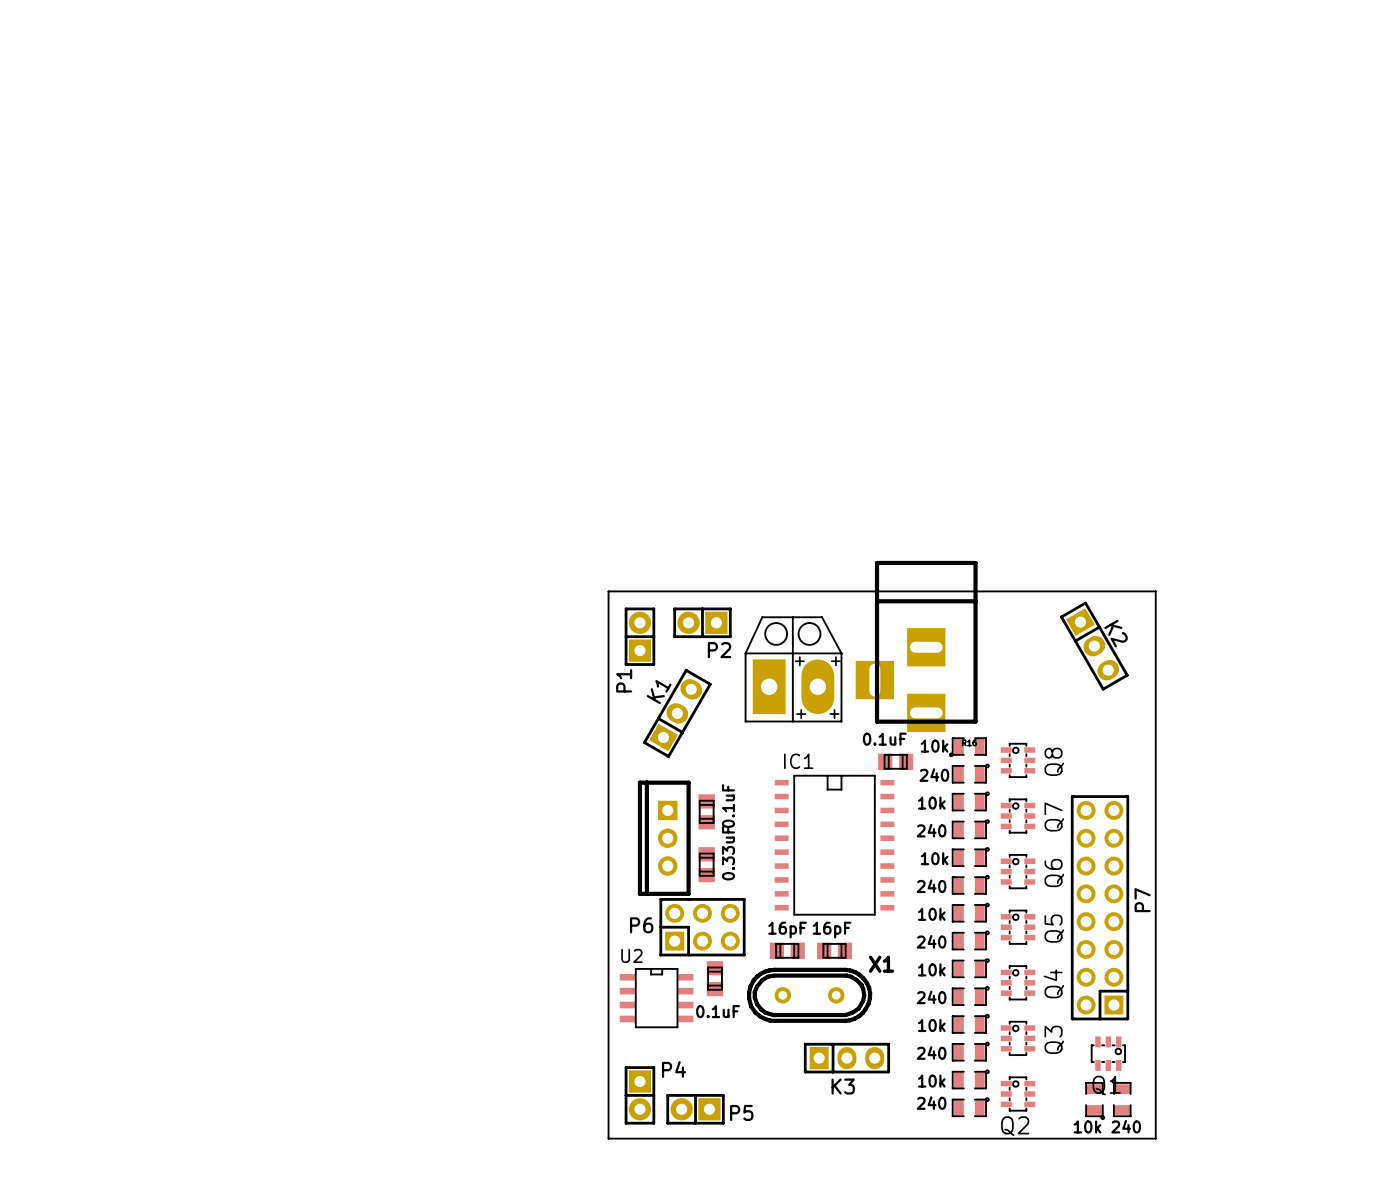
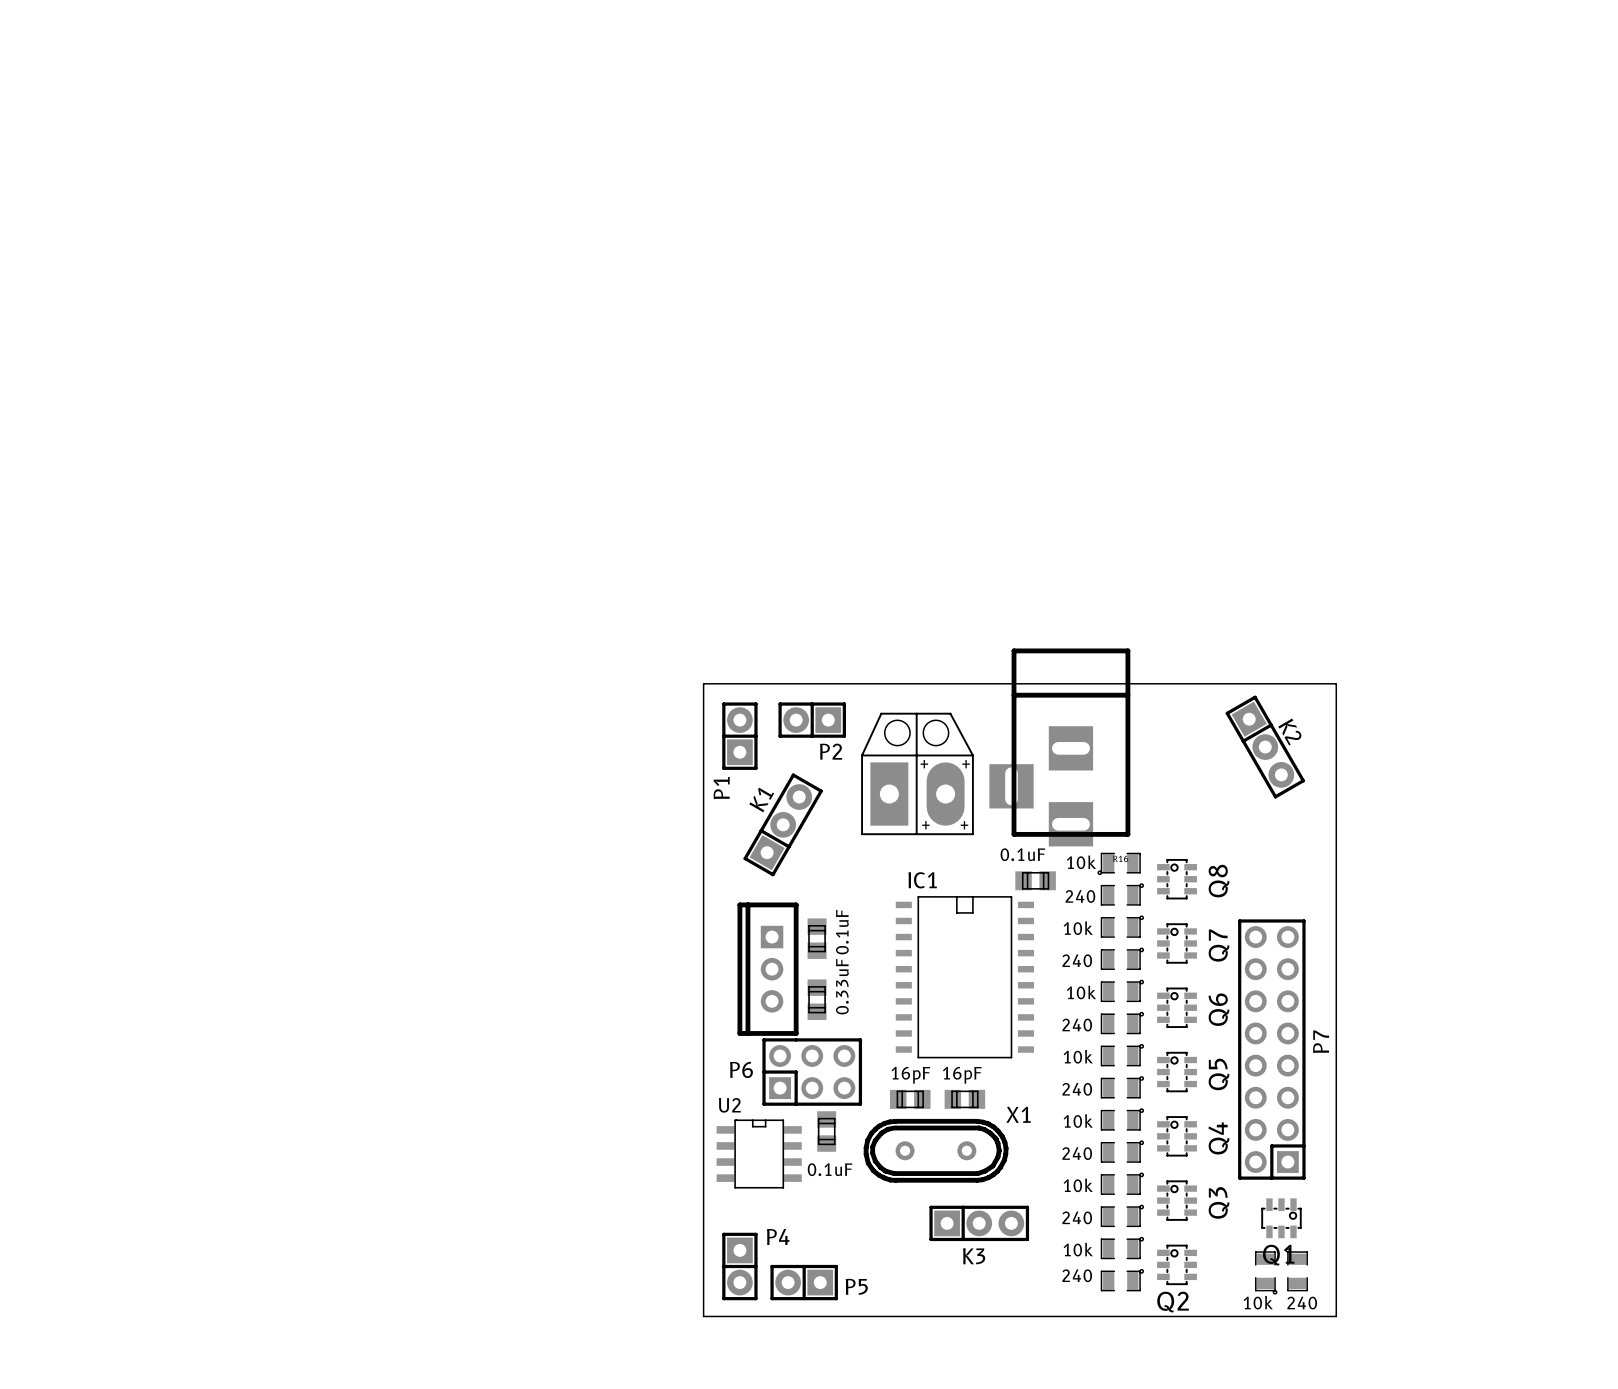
K2 footprint: [1060, 601, 1129, 691] -> [1225, 695, 1305, 799]
K1 footprint: [643, 668, 712, 758] -> [743, 773, 823, 877]
K3 footprint: [803, 1042, 891, 1074] -> [929, 1205, 1030, 1242]

